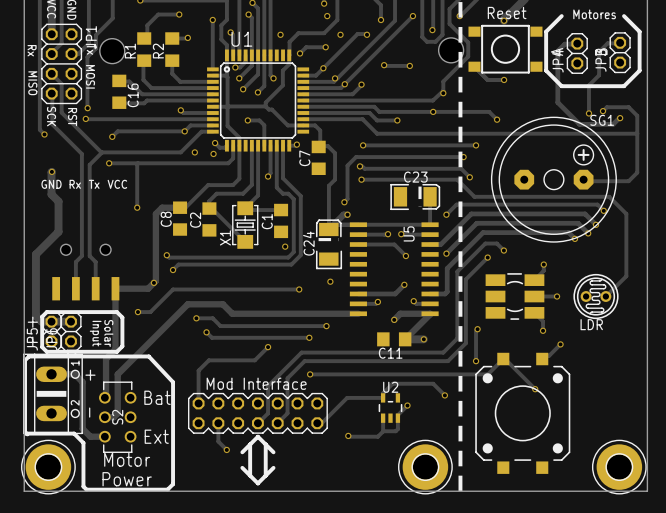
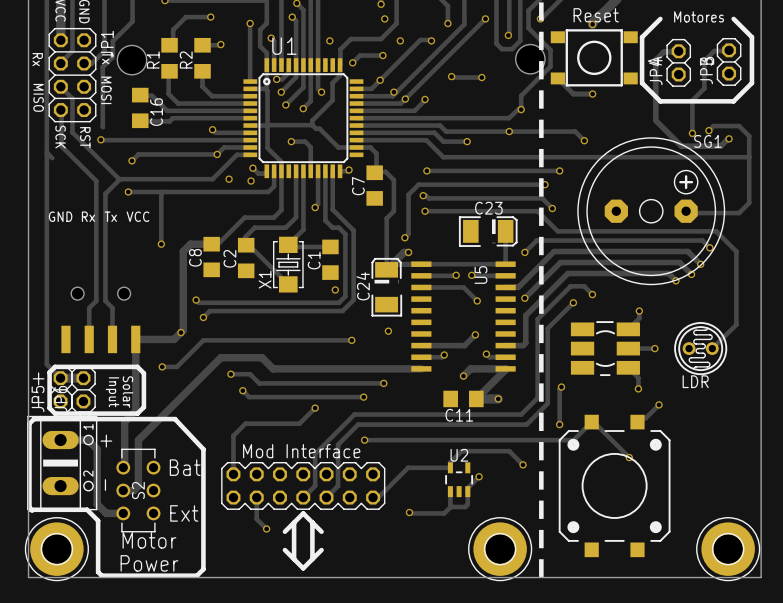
via: (87, 108) -> none
via: (44, 134) -> none
track: (51, 171) (51, 194) (58, 201) (58, 231) (35, 254) (35, 315) (41, 321) (51, 321) -> (46, 152) (46, 364) (60, 378)
via: (51, 171) -> none

